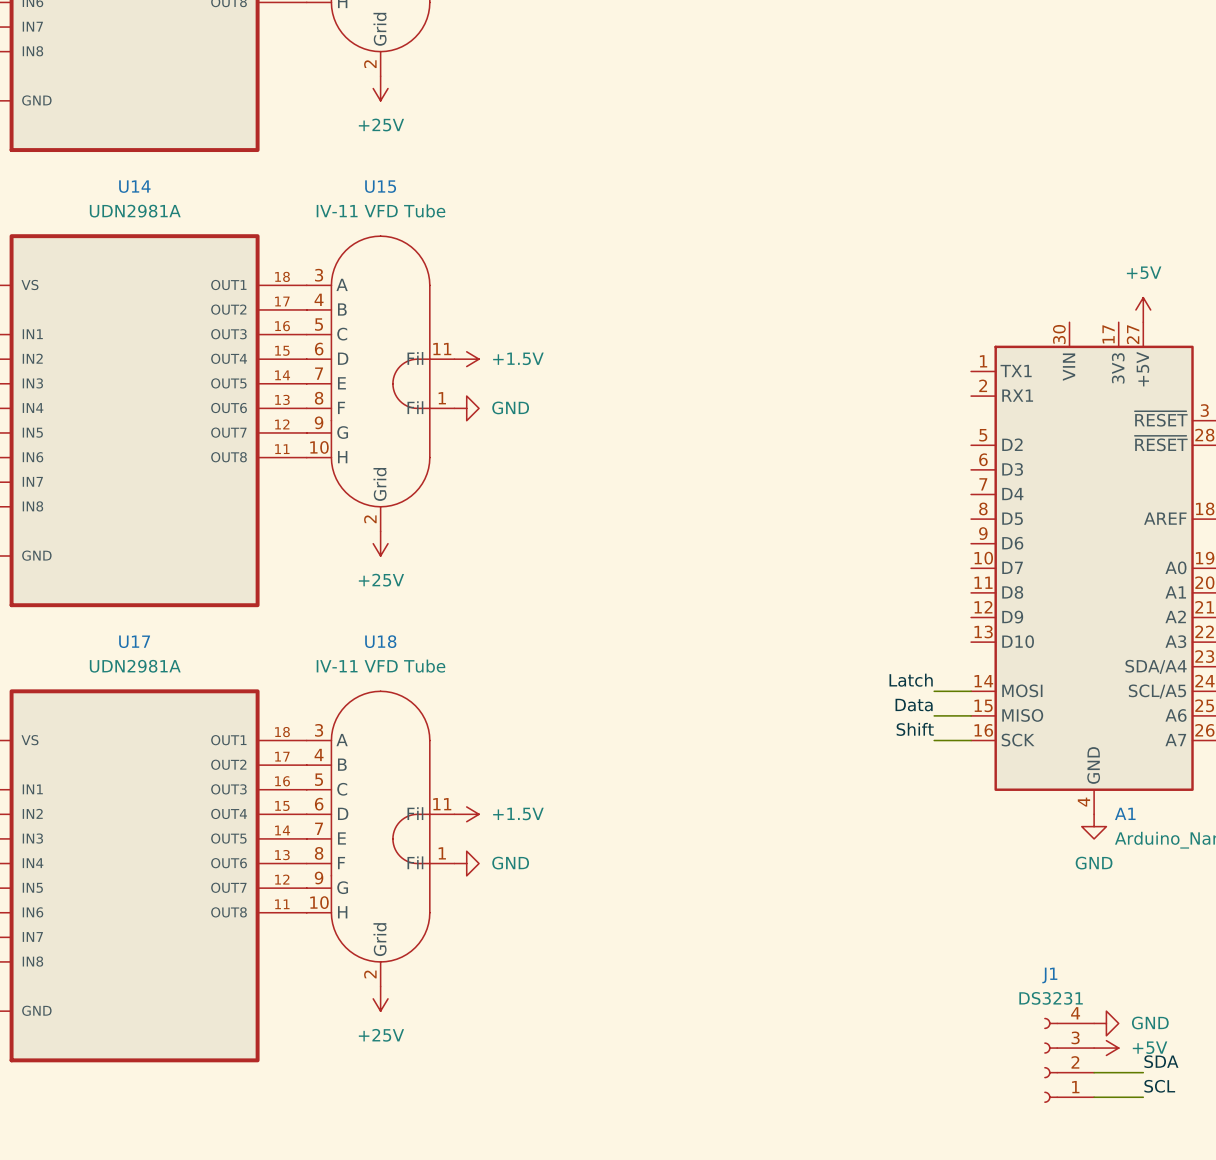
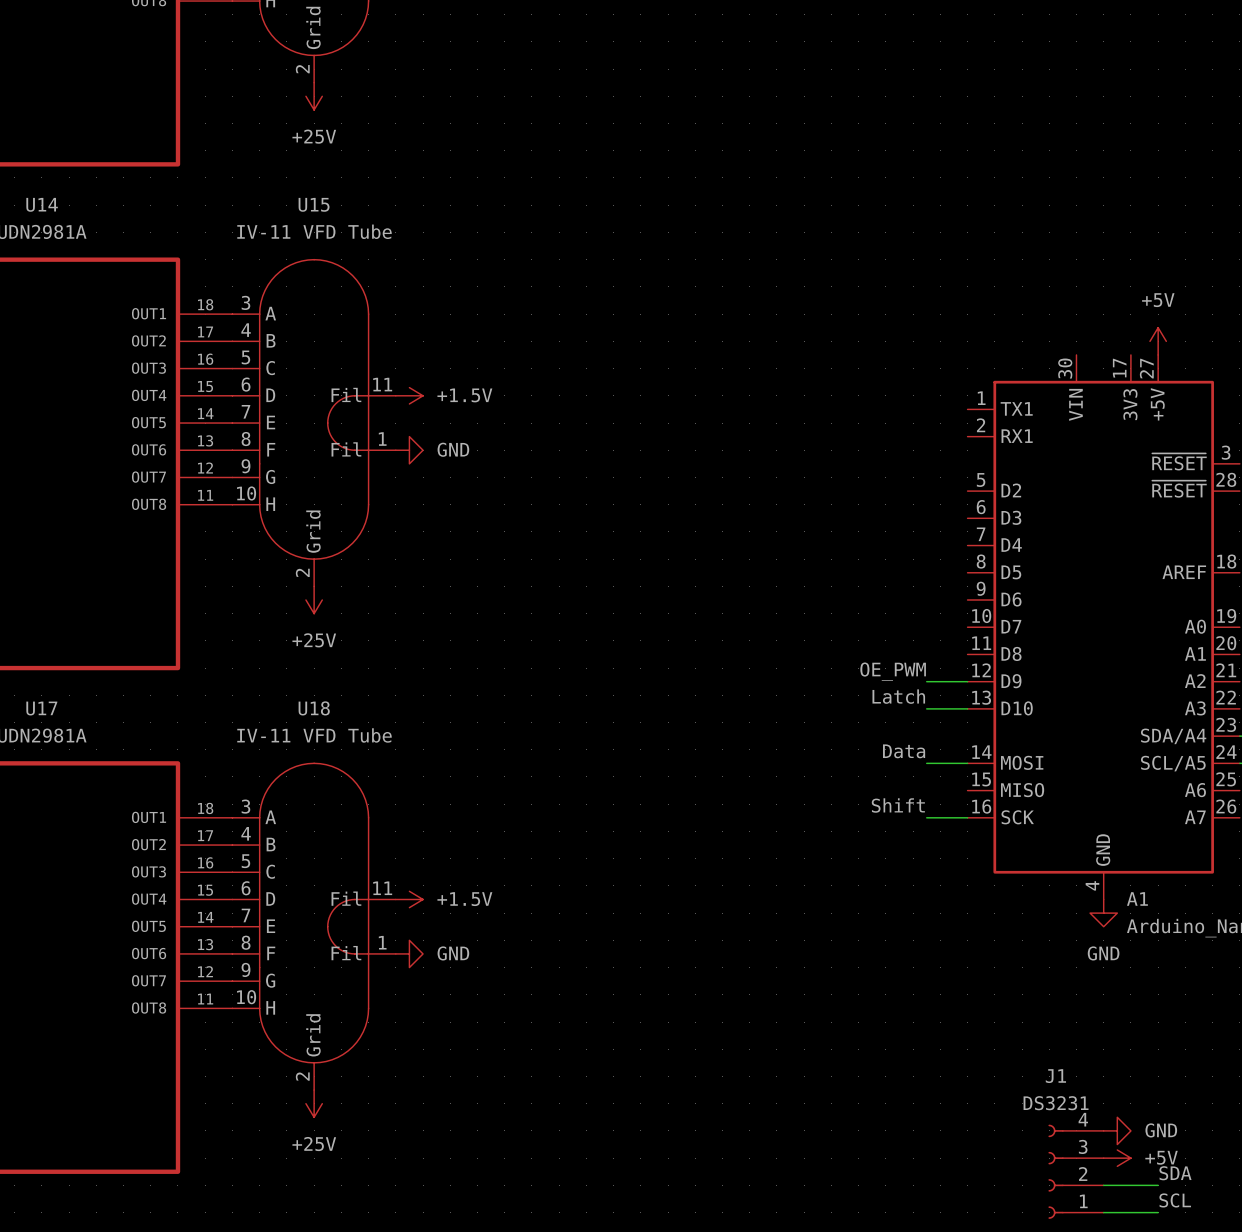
label: none -> OE_PWM (893, 671)
wire: none -> (926, 681) (967, 681)
label: none -> Latch (898, 696)
label: Latch (911, 680) -> Data (904, 751)
label: Data (914, 705) -> none
wire: (934, 715) (971, 715) -> (926, 708) (967, 708)

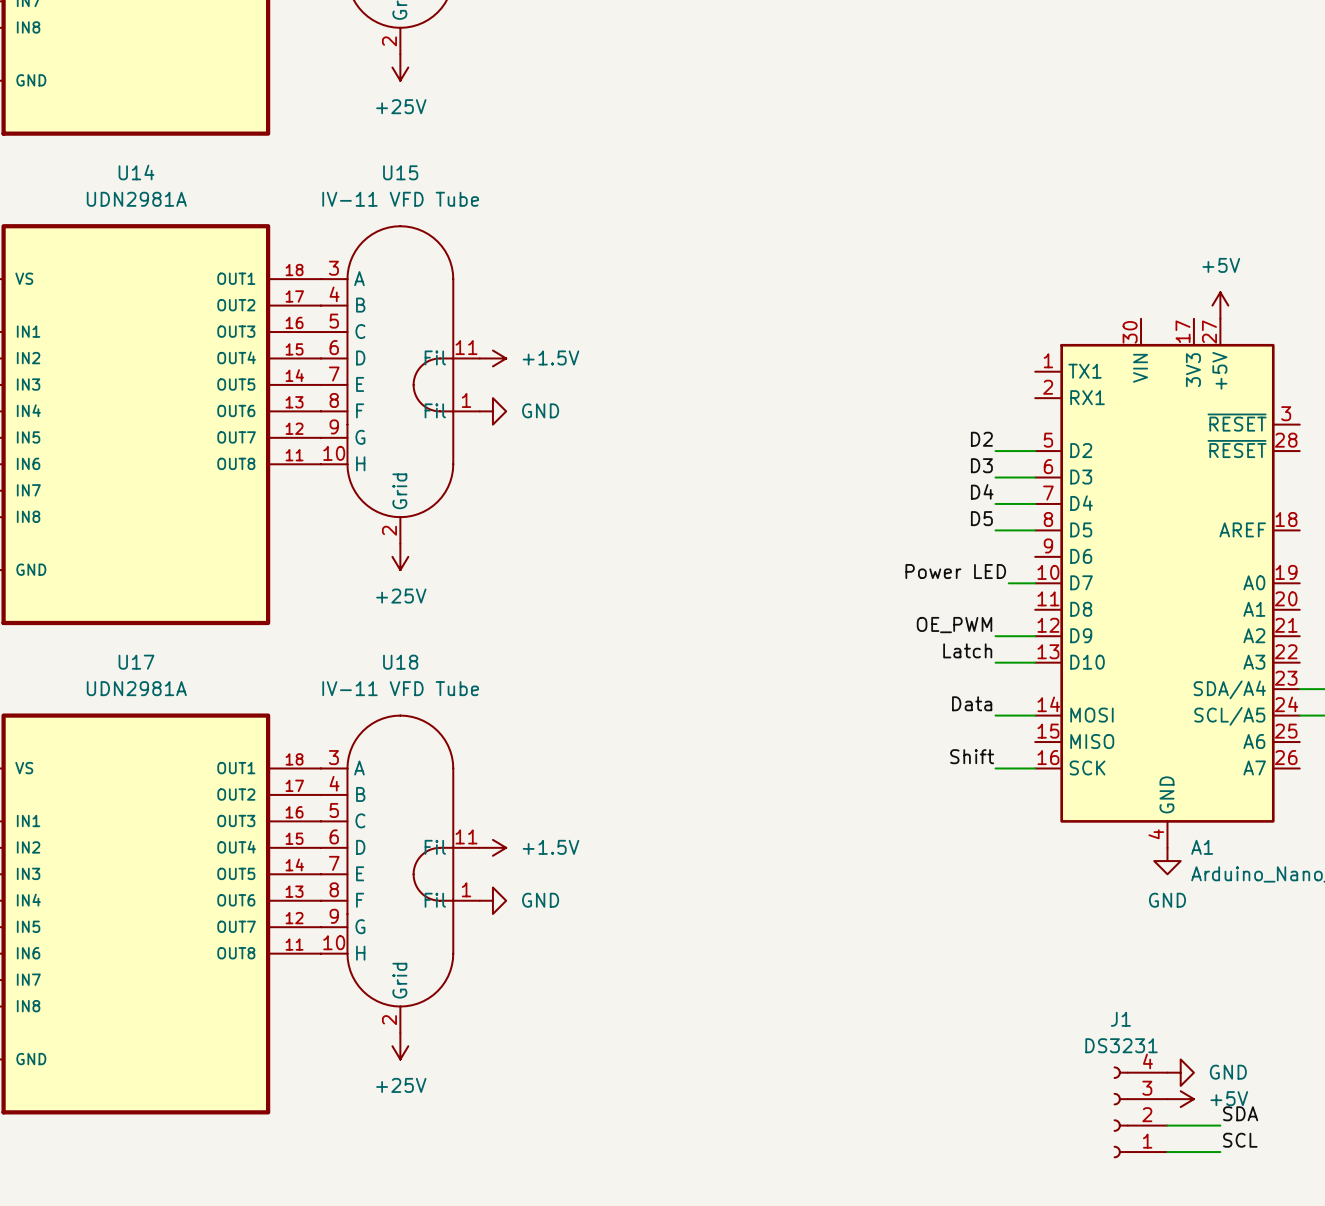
label: none -> D2 (981, 439)
wire: none -> (995, 451) (1035, 451)
label: none -> D3 (981, 465)
wire: none -> (995, 477) (1035, 477)
label: none -> D4 (982, 491)
wire: none -> (995, 503) (1035, 503)
label: none -> D5 (981, 518)
wire: none -> (995, 530) (1035, 530)
label: none -> Power LED (955, 571)
wire: none -> (1008, 583) (1035, 583)

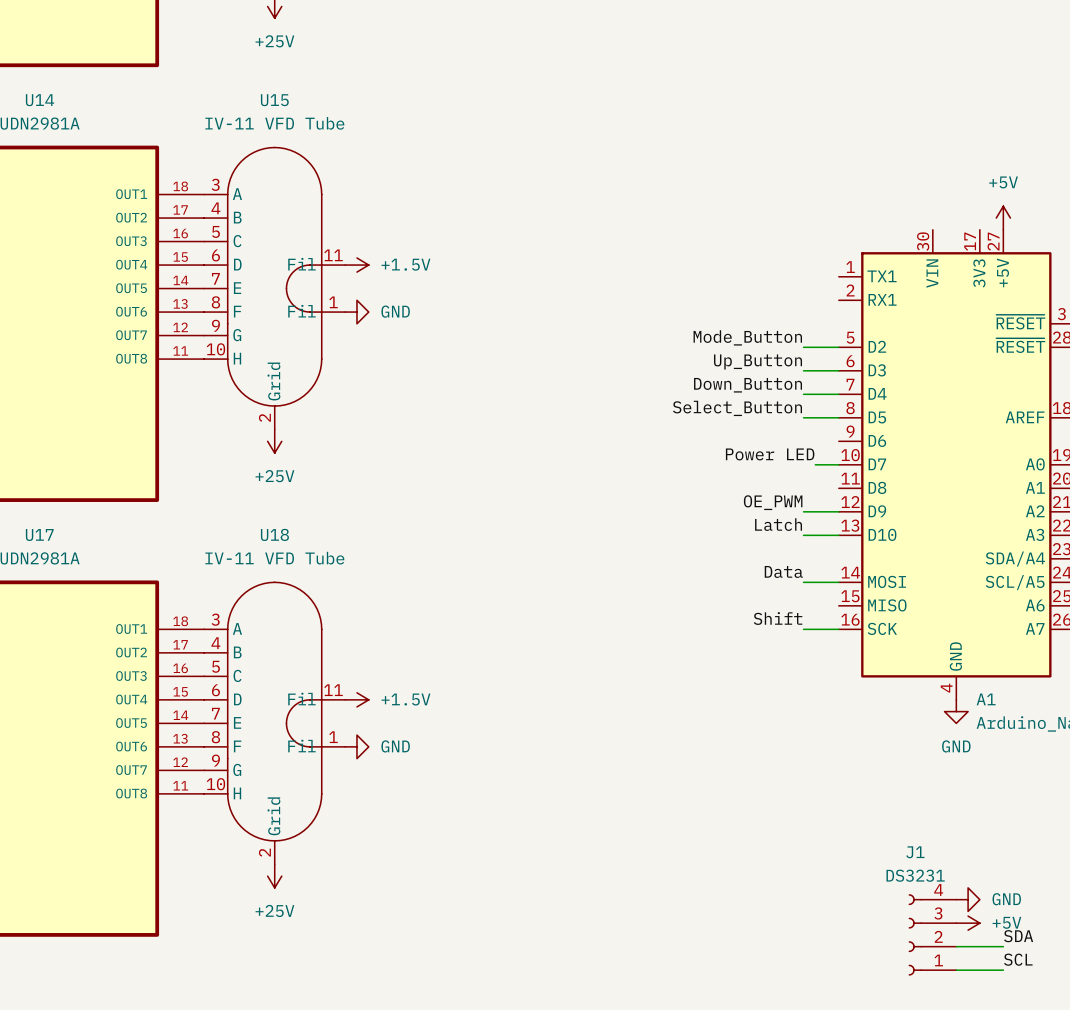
label: D2 (981, 439) -> Mode_Button (747, 337)
label: D3 (981, 465) -> Up_Button (757, 362)
label: D4 (982, 491) -> Down_Button (748, 385)
label: D5 (981, 518) -> Select_Button (737, 408)

